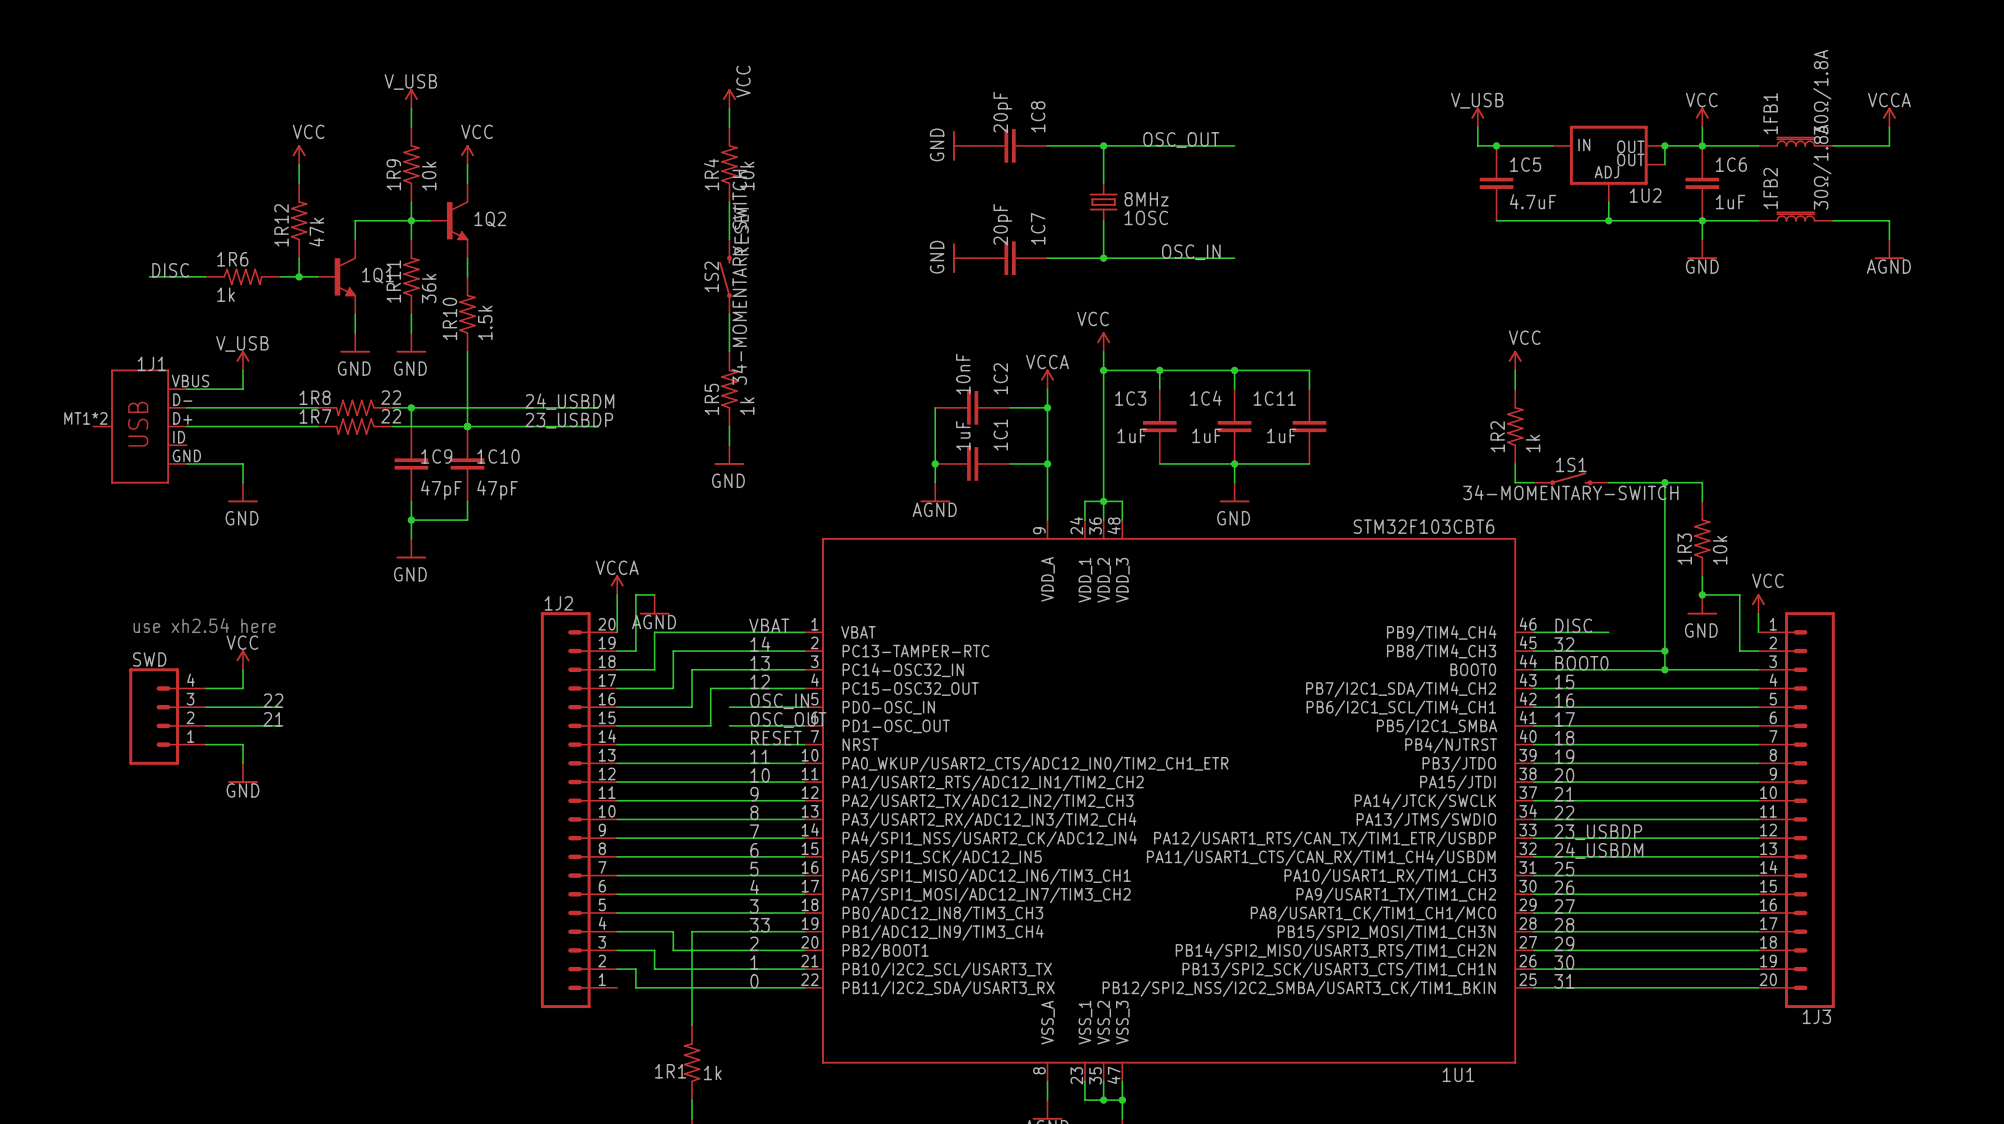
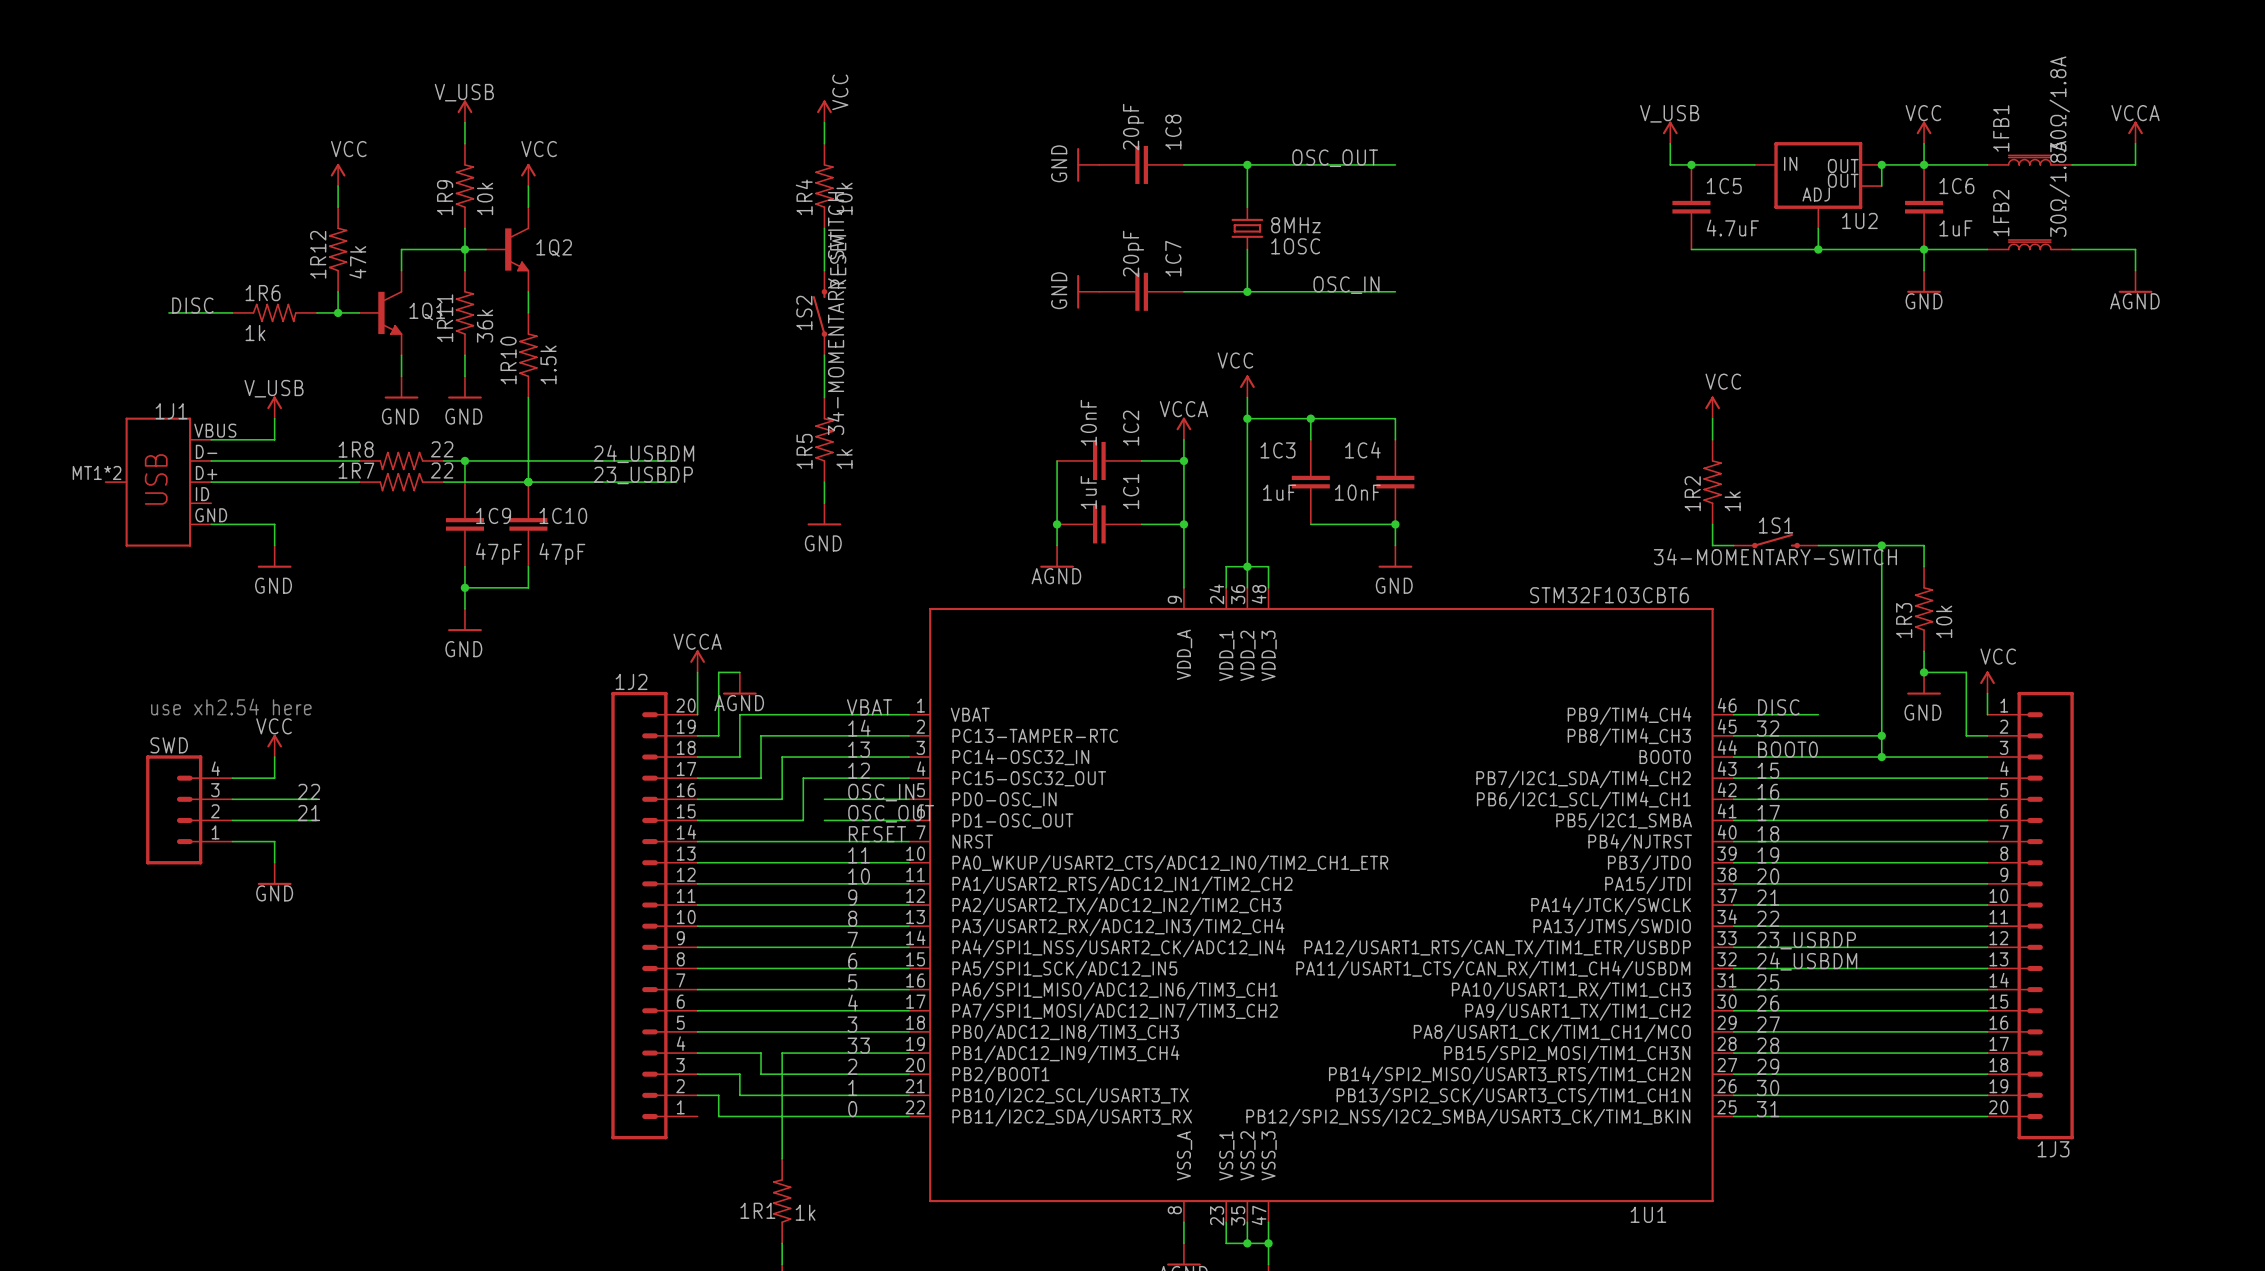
wire: (1234, 370) (1309, 370) (1309, 389) -> none
junction: (1234, 370) -> none
1C11: 1uF (1309, 426) -> none
1C4 value: 1uF (1206, 435) -> 10nF (1357, 492)
wire: (1234, 463) (1309, 463) -> none

